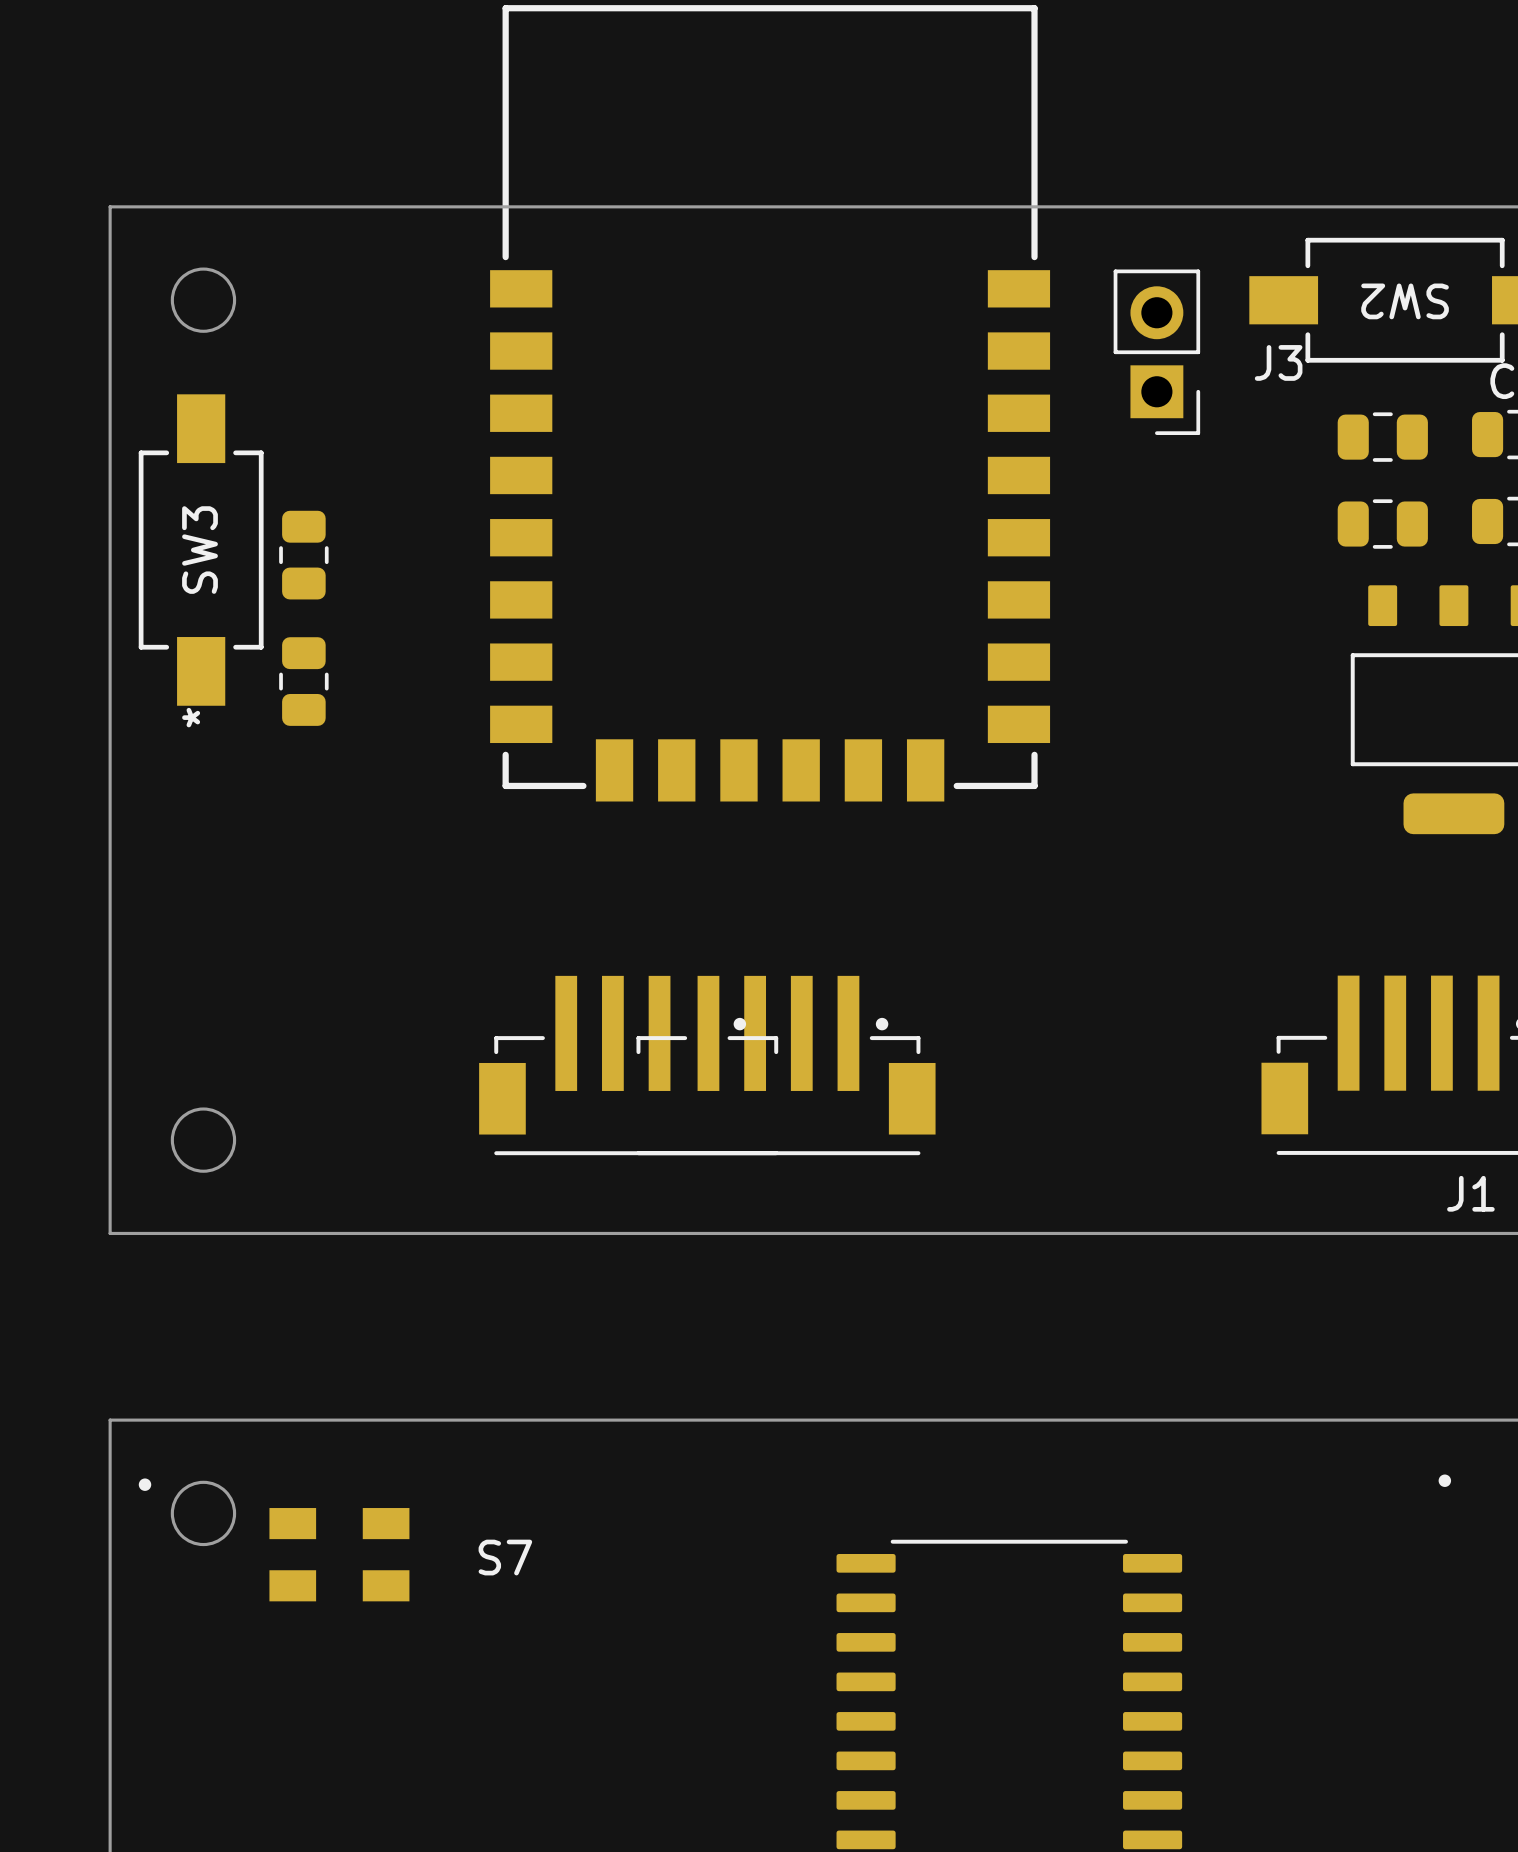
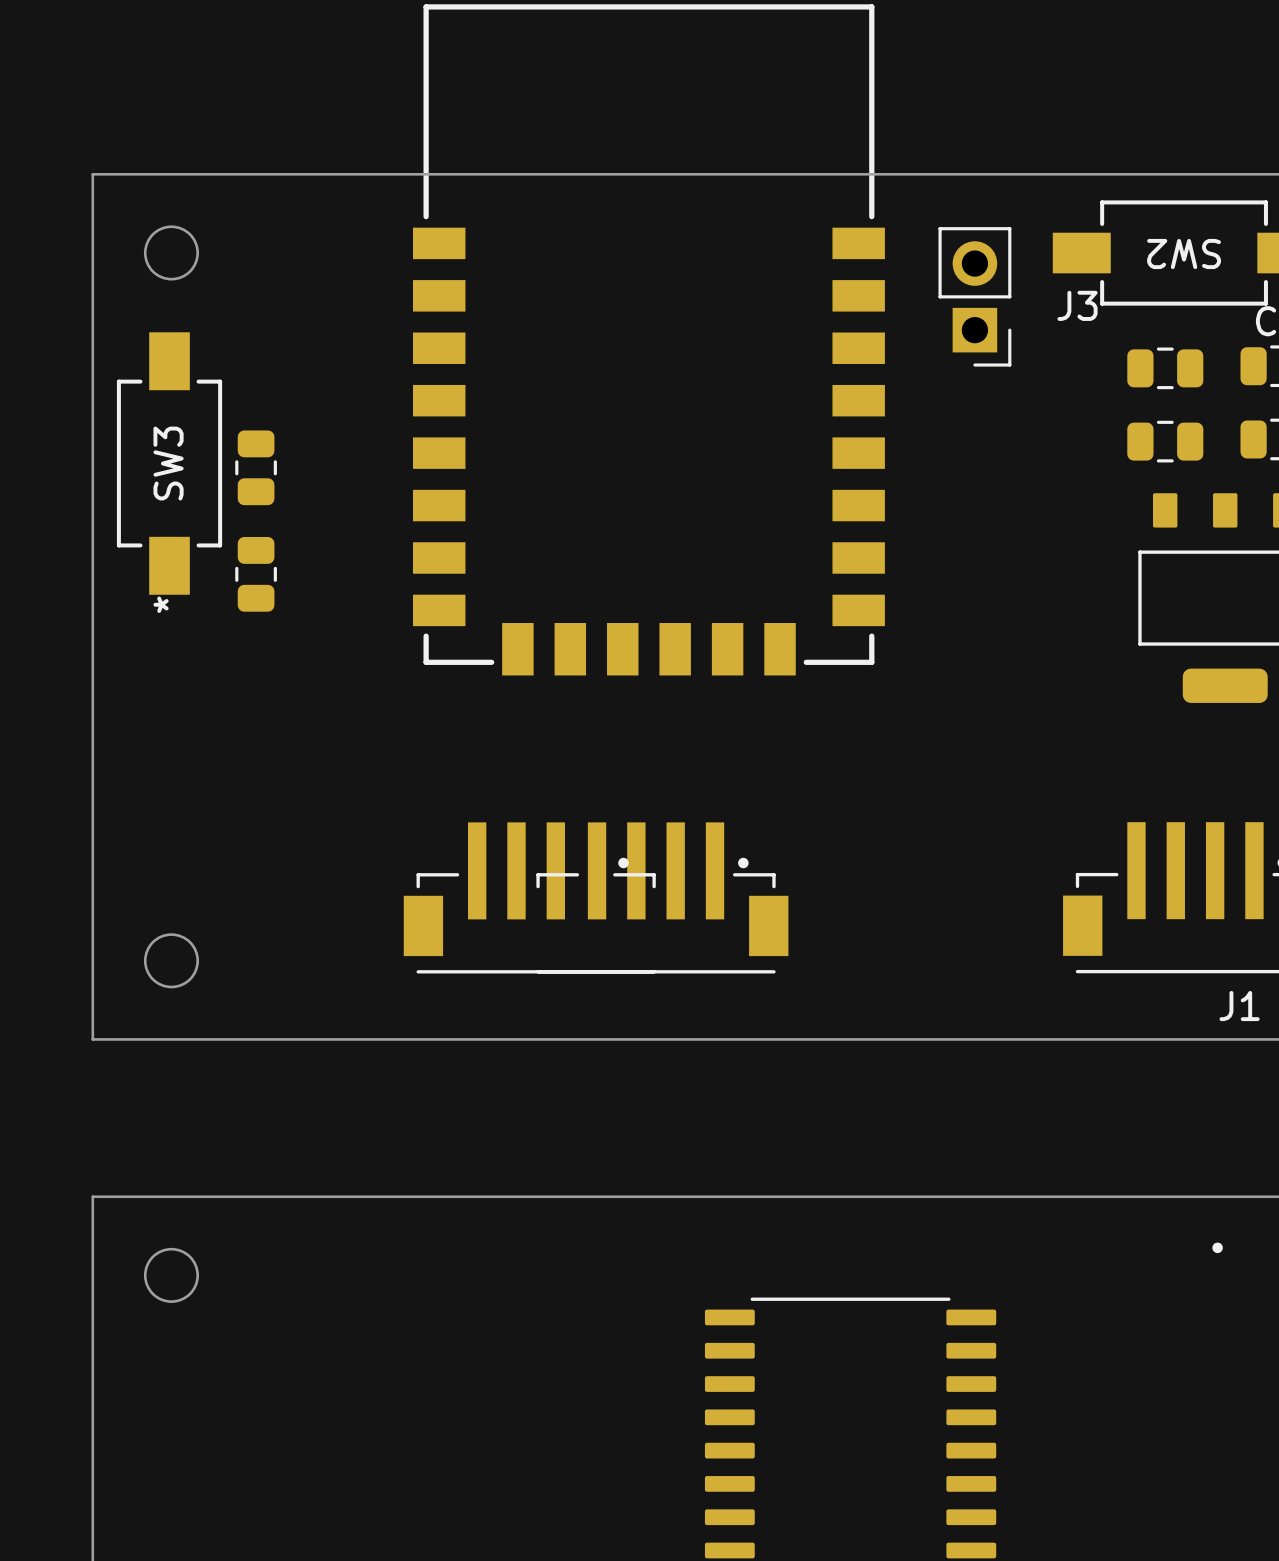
S7: (274, 1539) -> none

